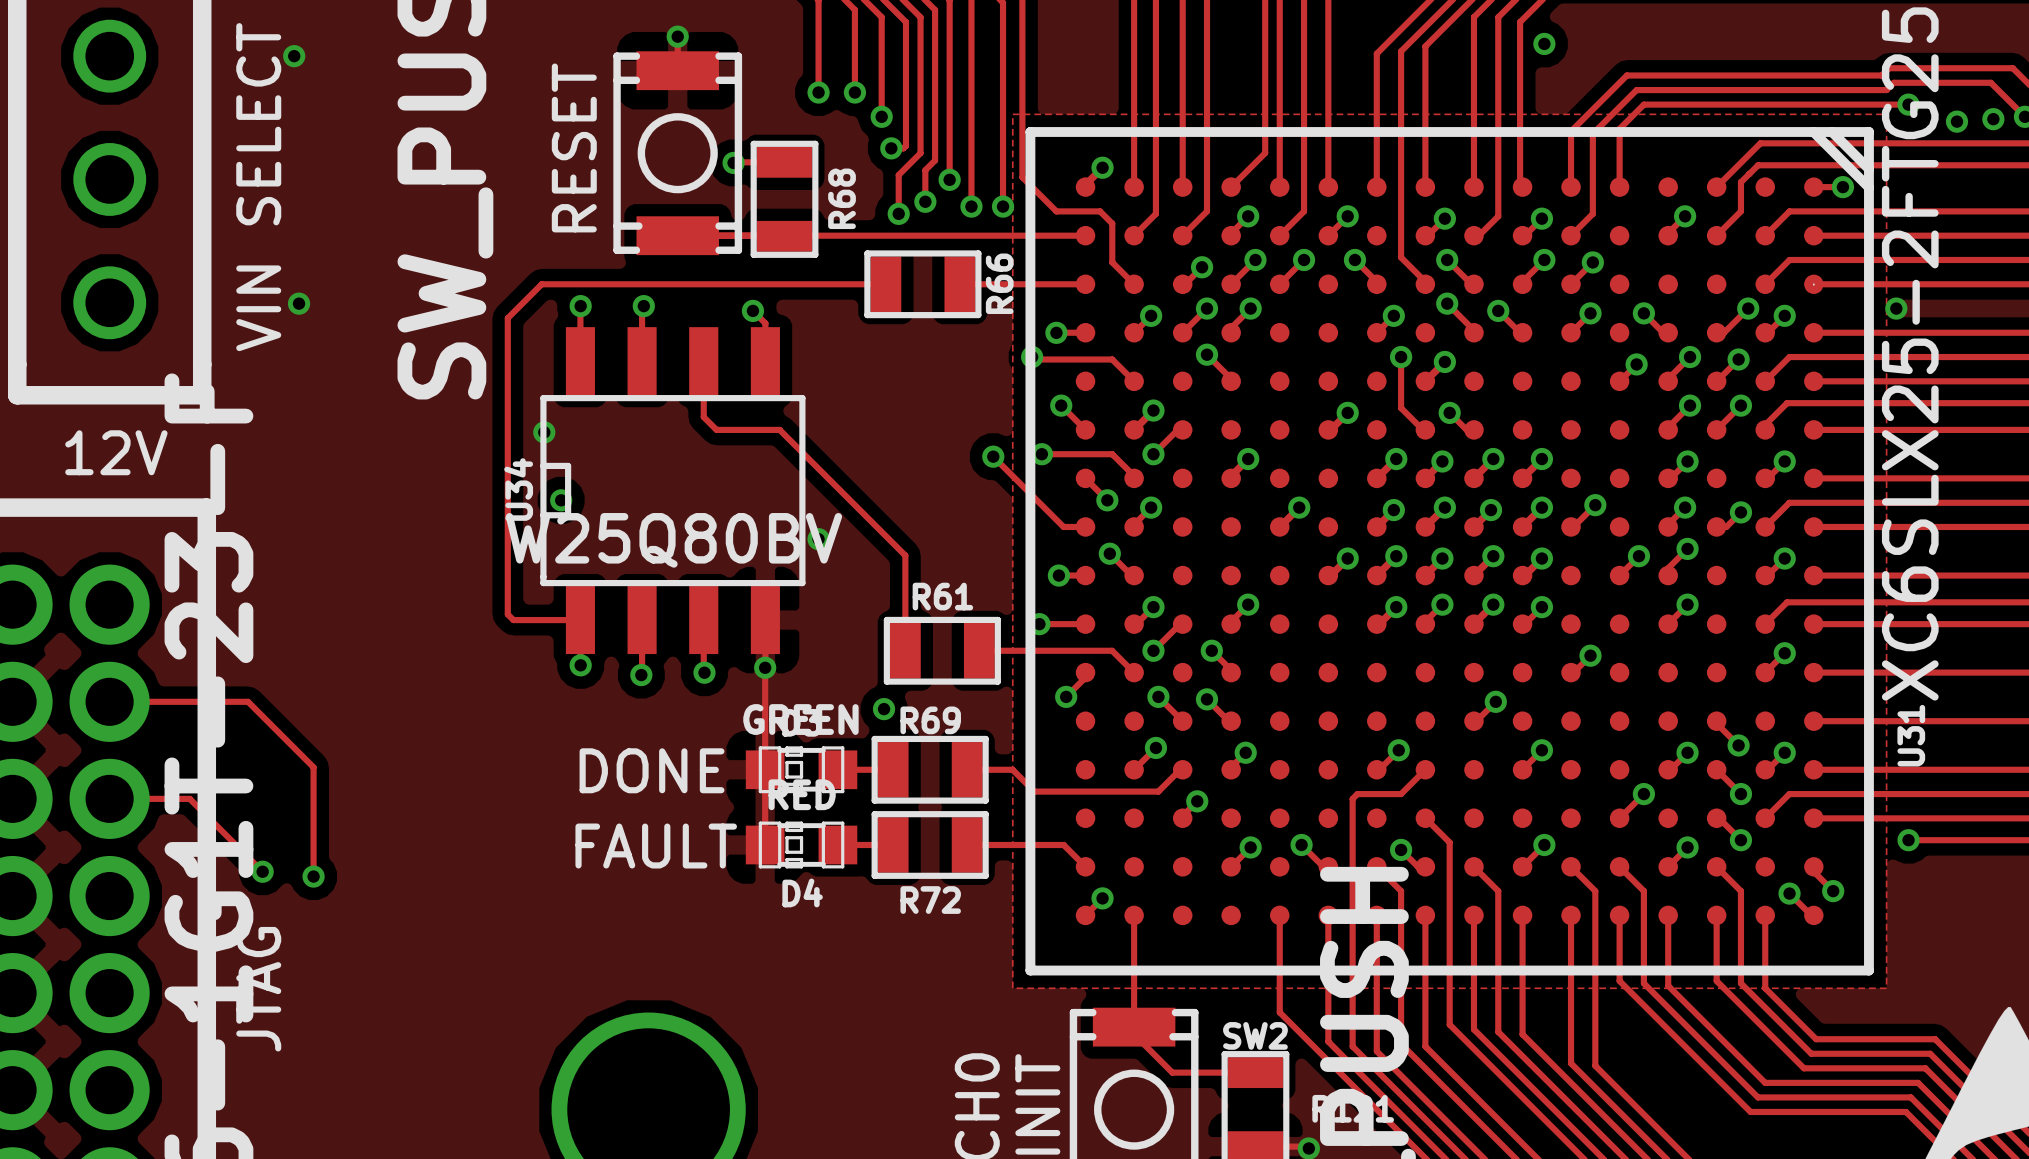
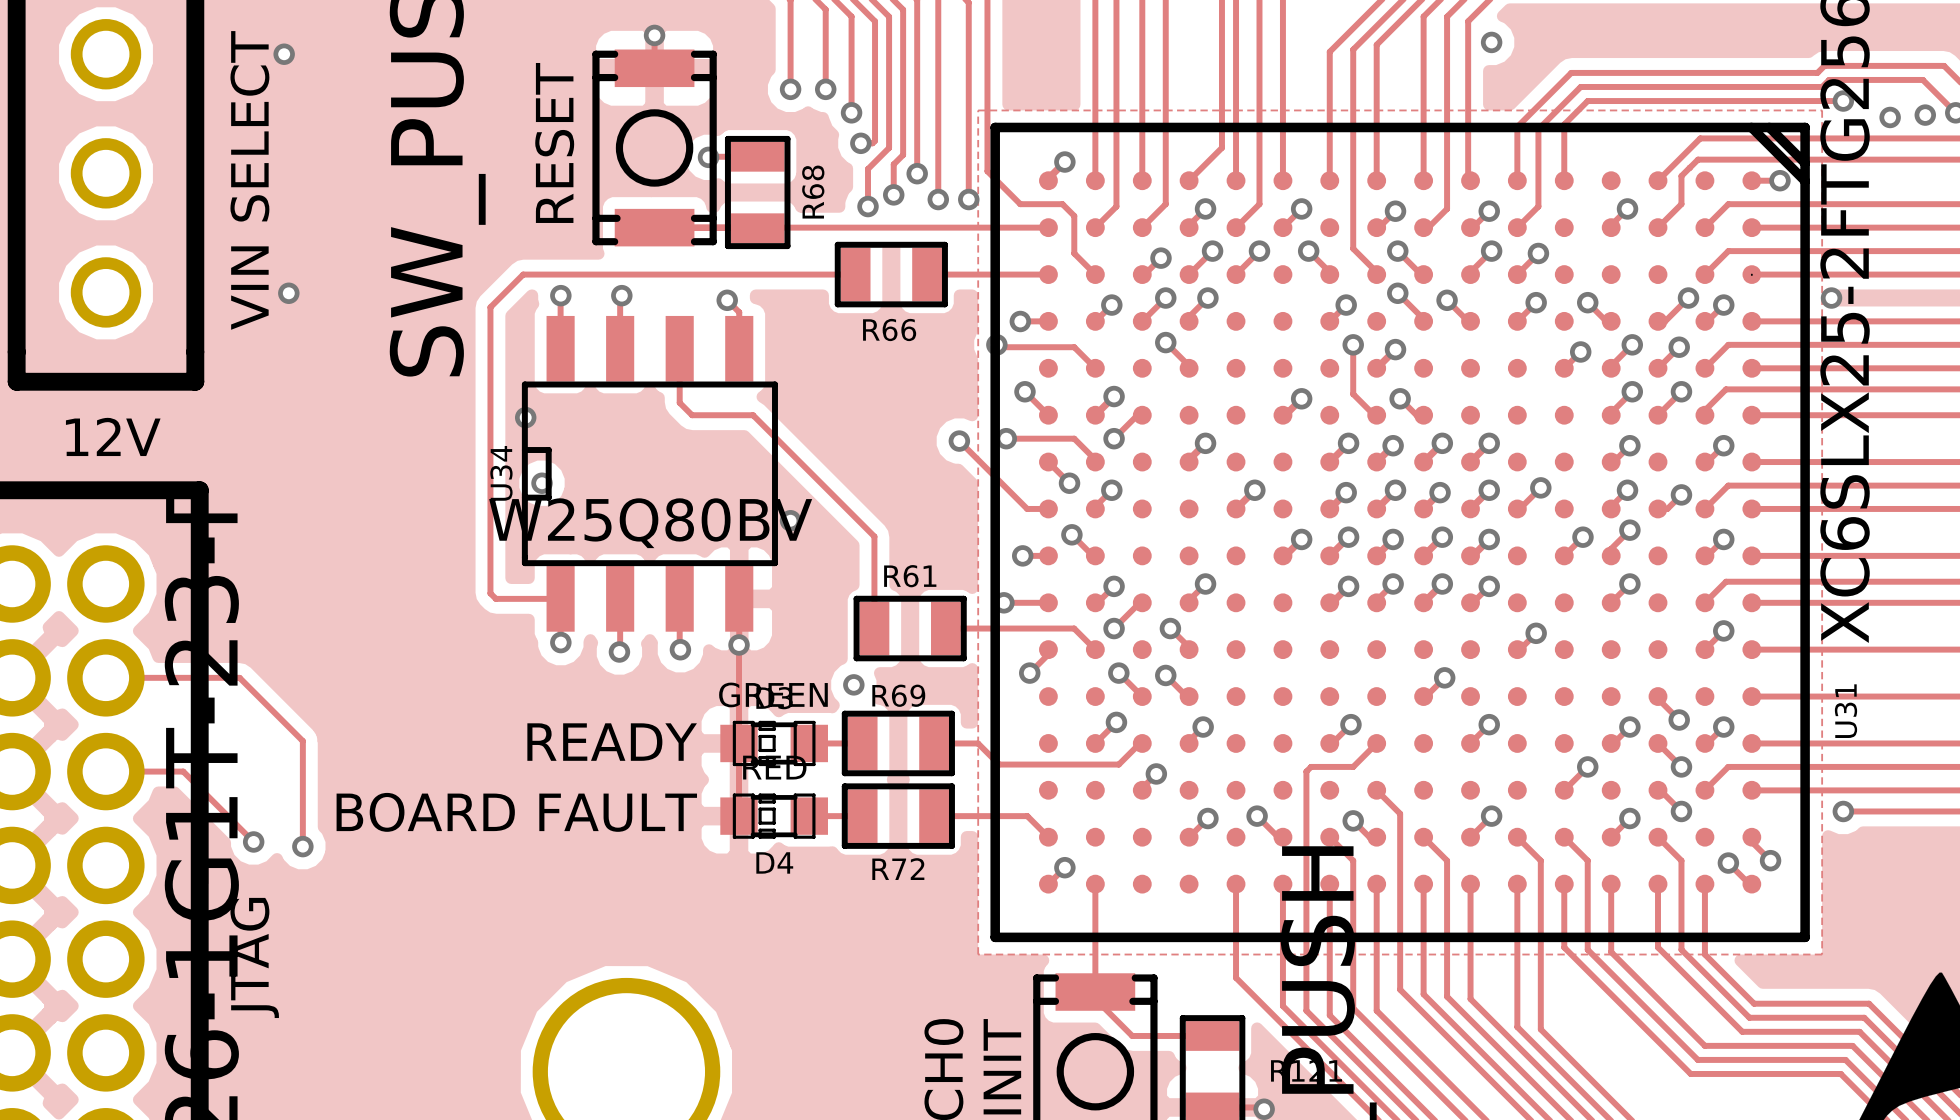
R66 name rotation: 0° (999, 283) -> 90° clockwise (889, 330)
R66 name position: R66 (999, 283) -> R66 (889, 330)
text: none -> READY (612, 742)
text: DONE (652, 770) -> none
text: FAULT (656, 846) -> BOARD FAULT (516, 812)
SW2 name: SW2 (1255, 1035) -> none

